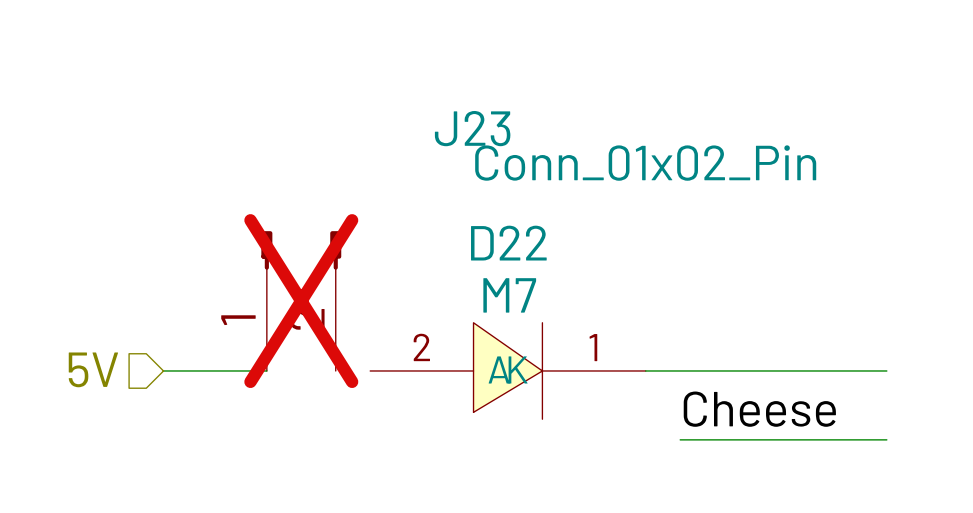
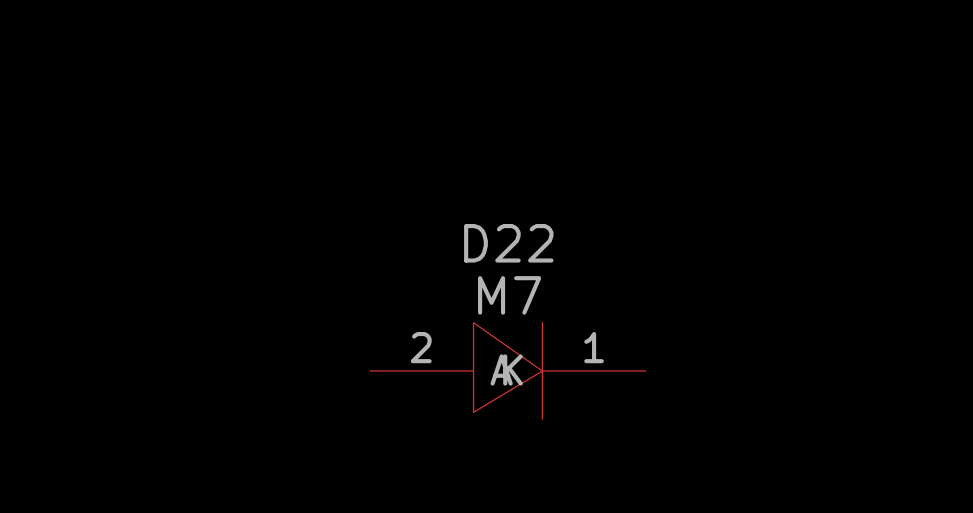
J23: Conn_01x02_Pin (301, 301) -> none
hierarchical label: 5V (93, 369) -> none
wire: (163, 370) (266, 370) -> none
wire: (645, 370) (886, 370) -> none
label: Cheese (759, 409) -> none
wire: (680, 439) (886, 439) -> none

